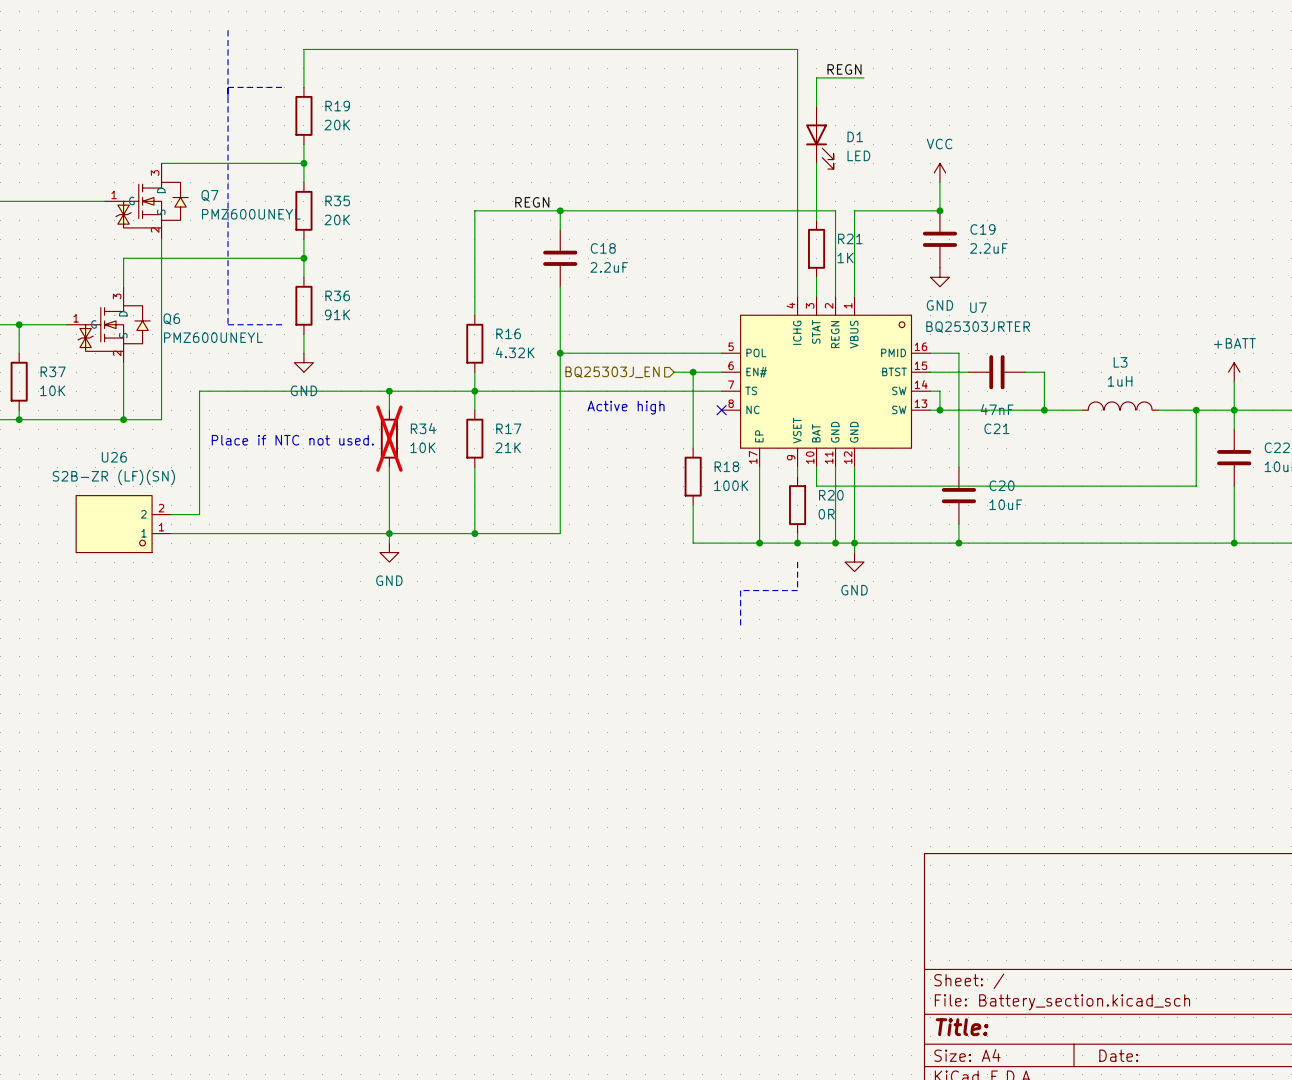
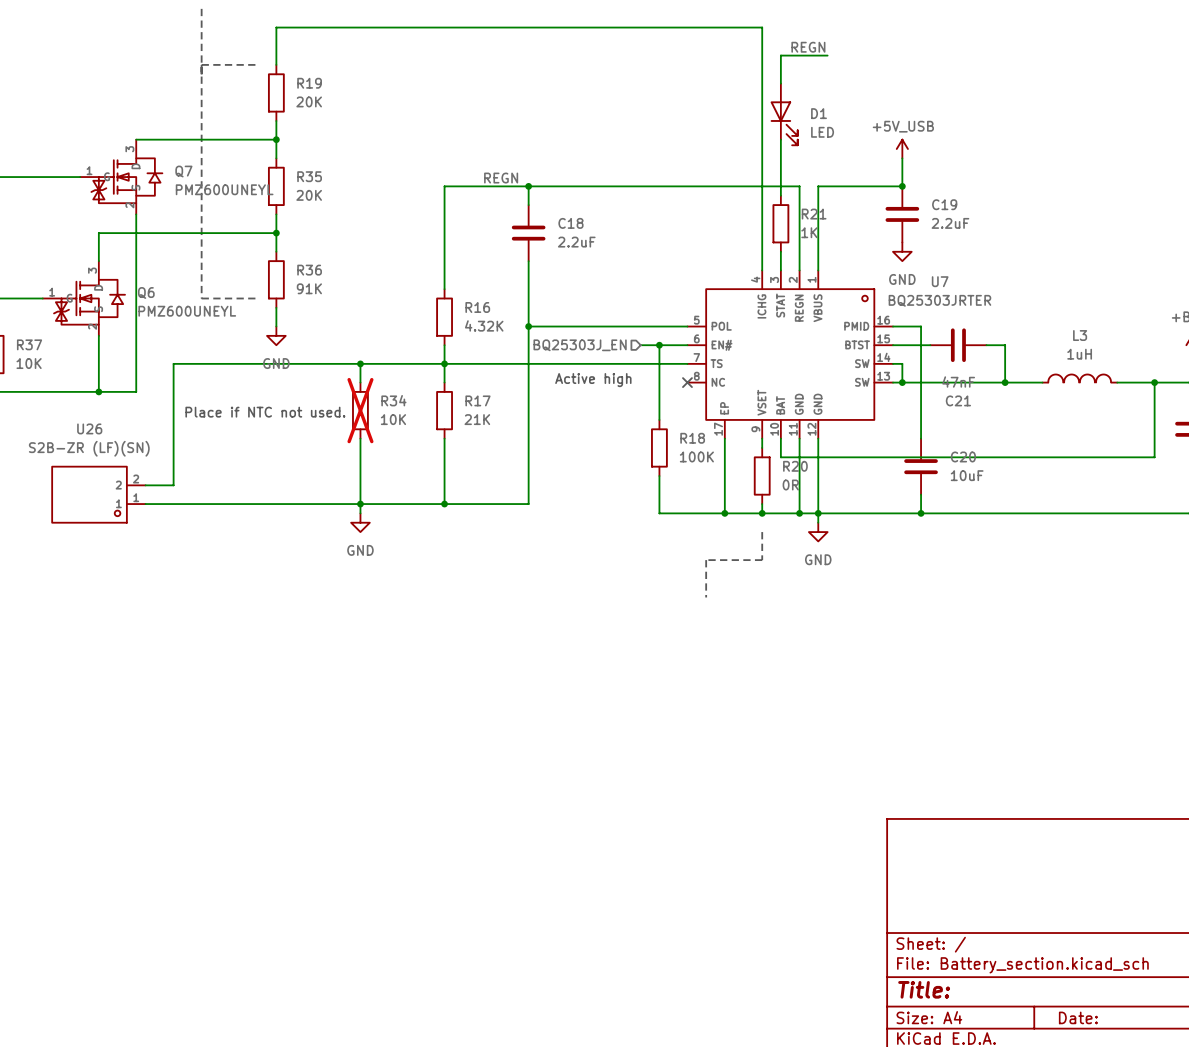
power symbol: VCC (939, 172) -> +5V_USB (902, 149)

